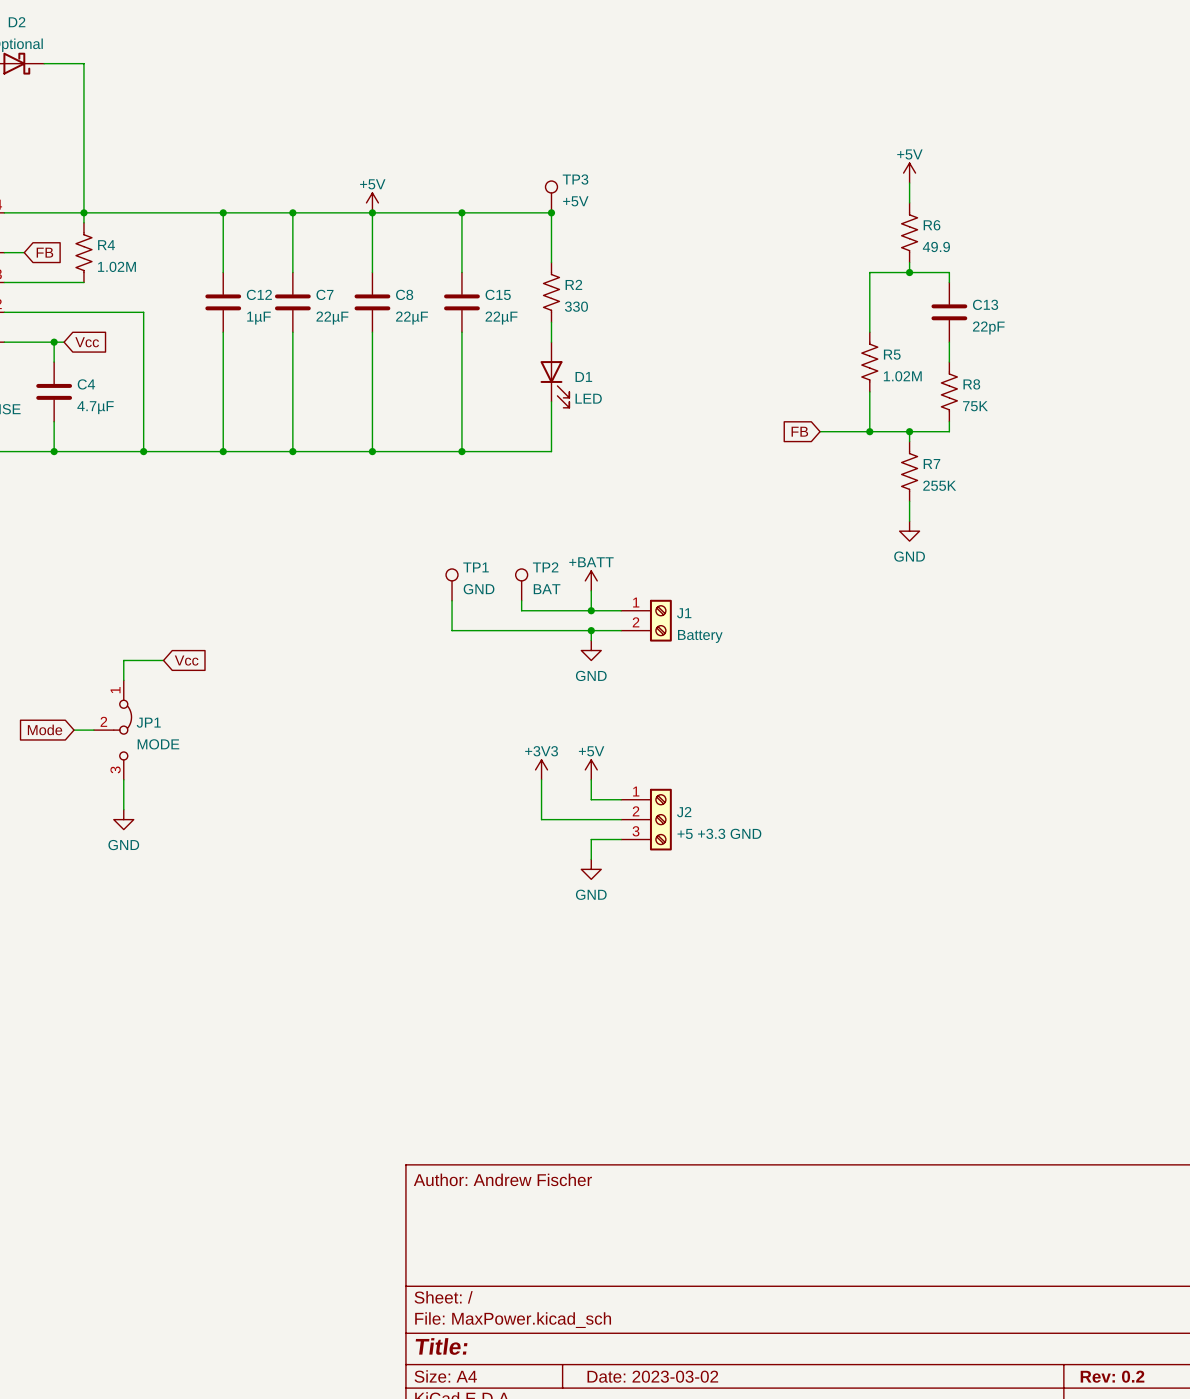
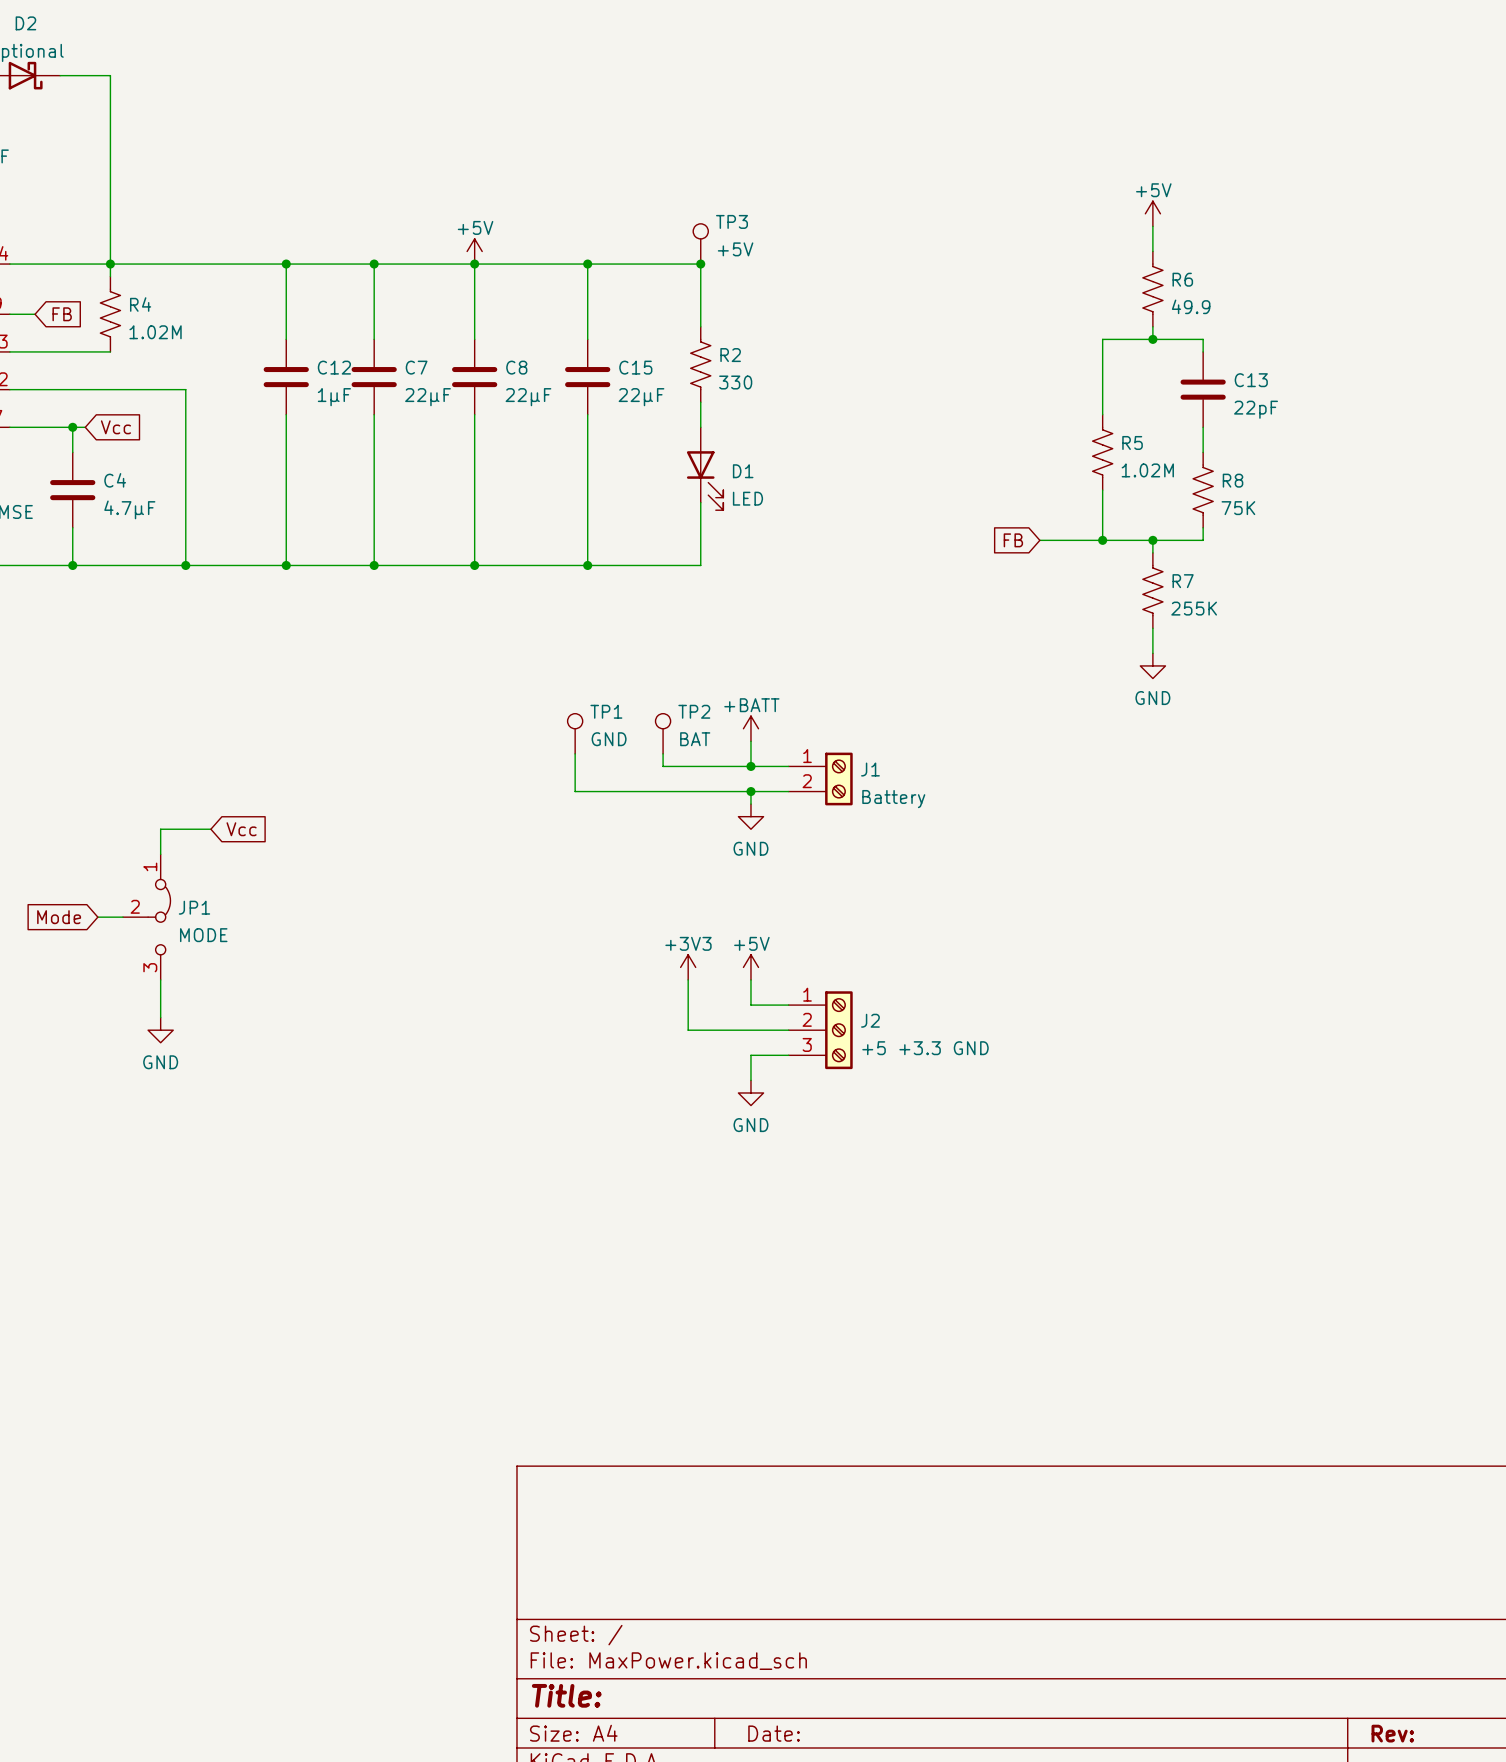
title block: Author: Andrew Fischer (502, 1179) -> none
title block: Date: 2023-03-02 (652, 1376) -> Date: (774, 1733)
title block: Rev: 0.2 (1112, 1376) -> Rev: (1392, 1733)

